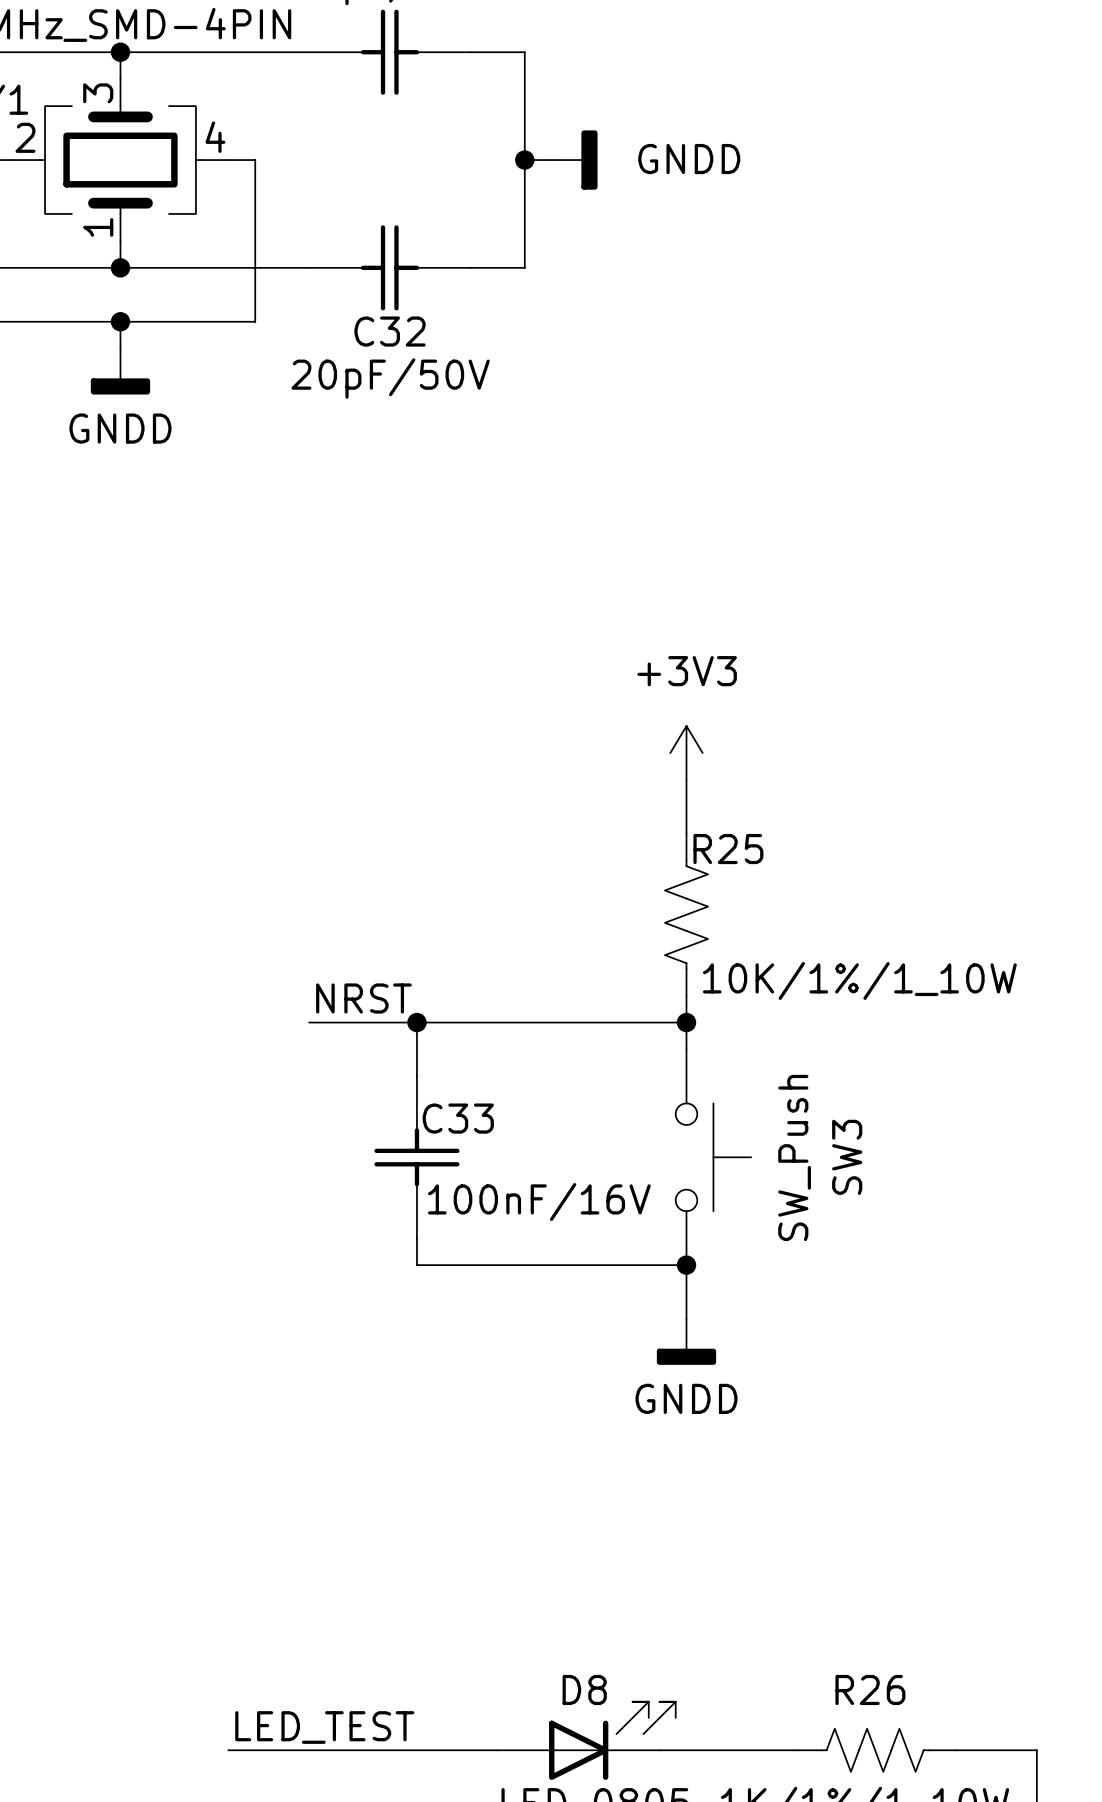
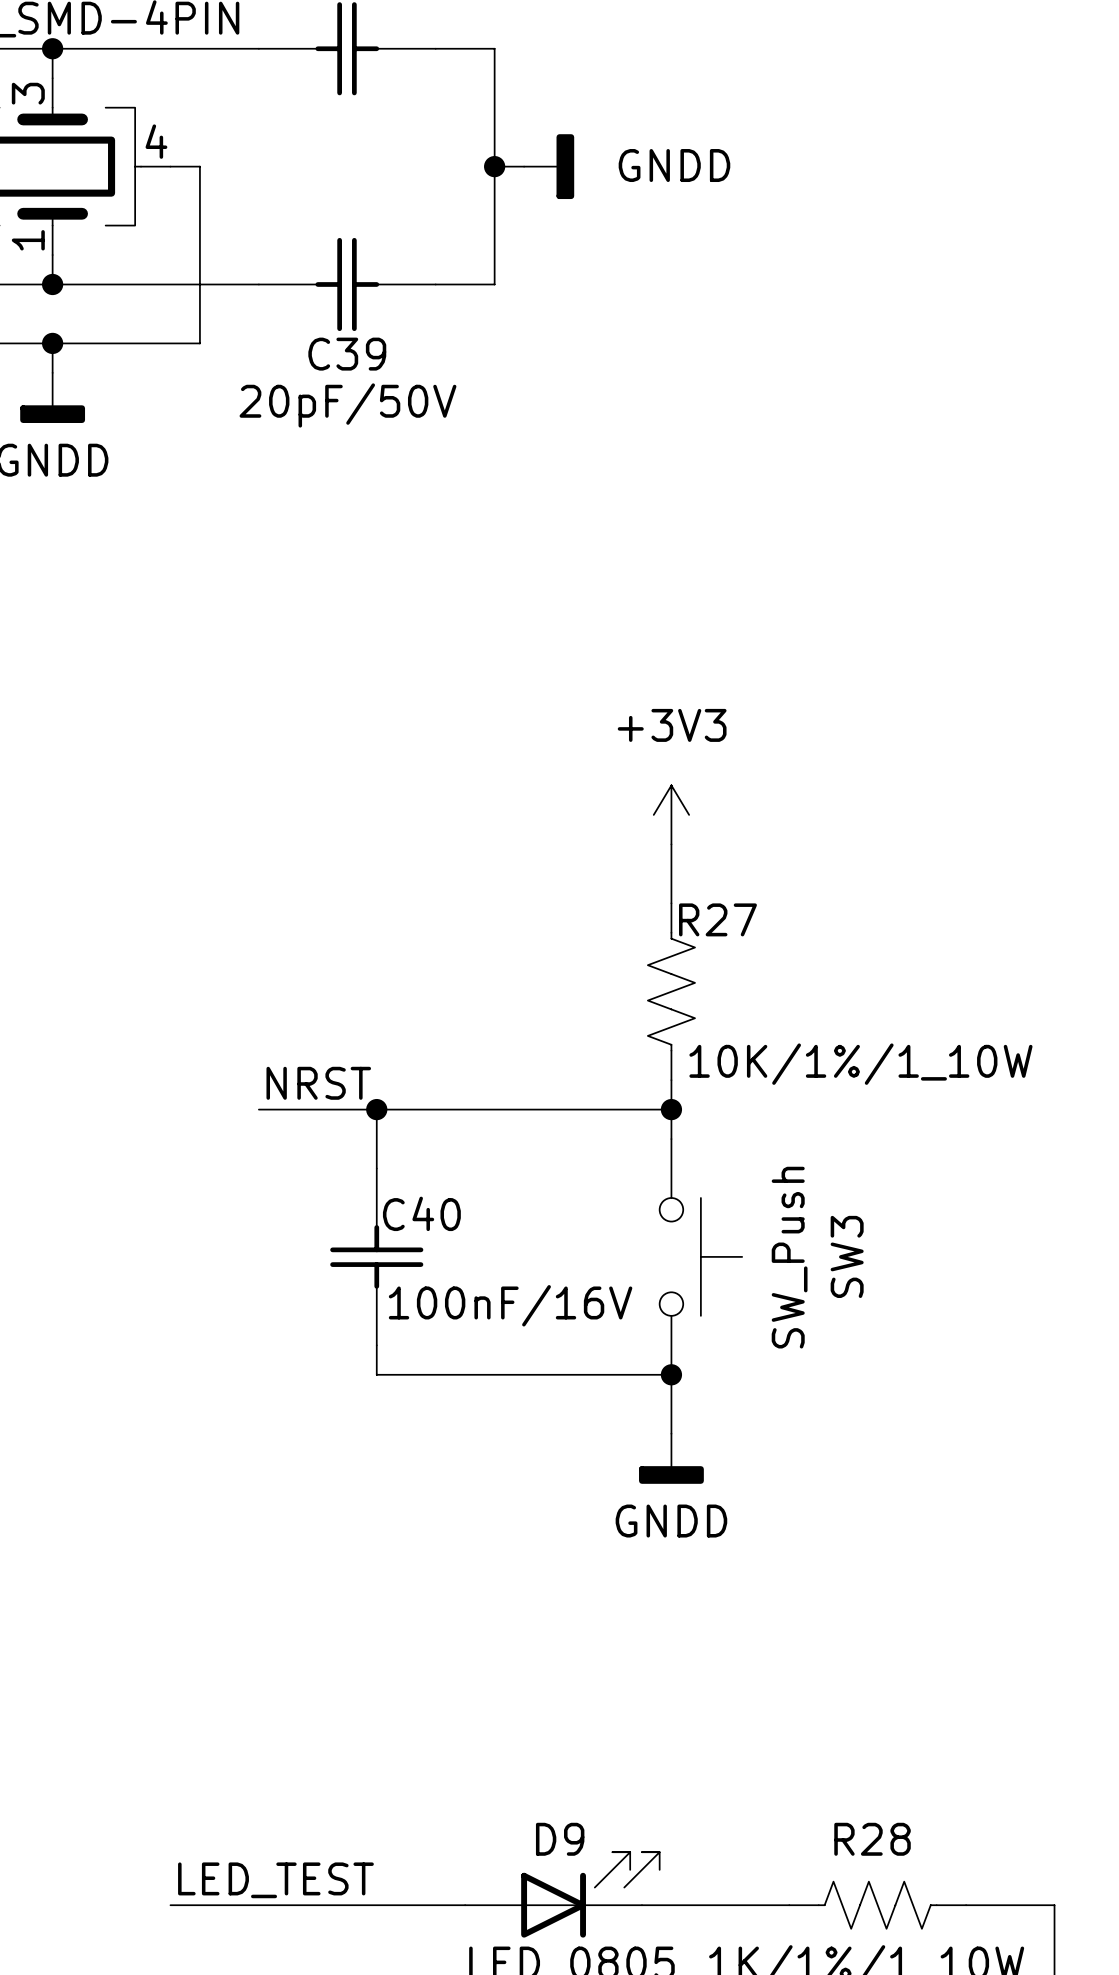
C32 name: C32 (390, 331) -> C39 (347, 354)
R25 name: R25 (728, 849) -> R27 (717, 919)
C33 name: C33 (458, 1118) -> C40 (421, 1213)
D8 name: D8 (584, 1689) -> D9 (560, 1839)
R26 name: R26 (870, 1689) -> R28 (872, 1839)

